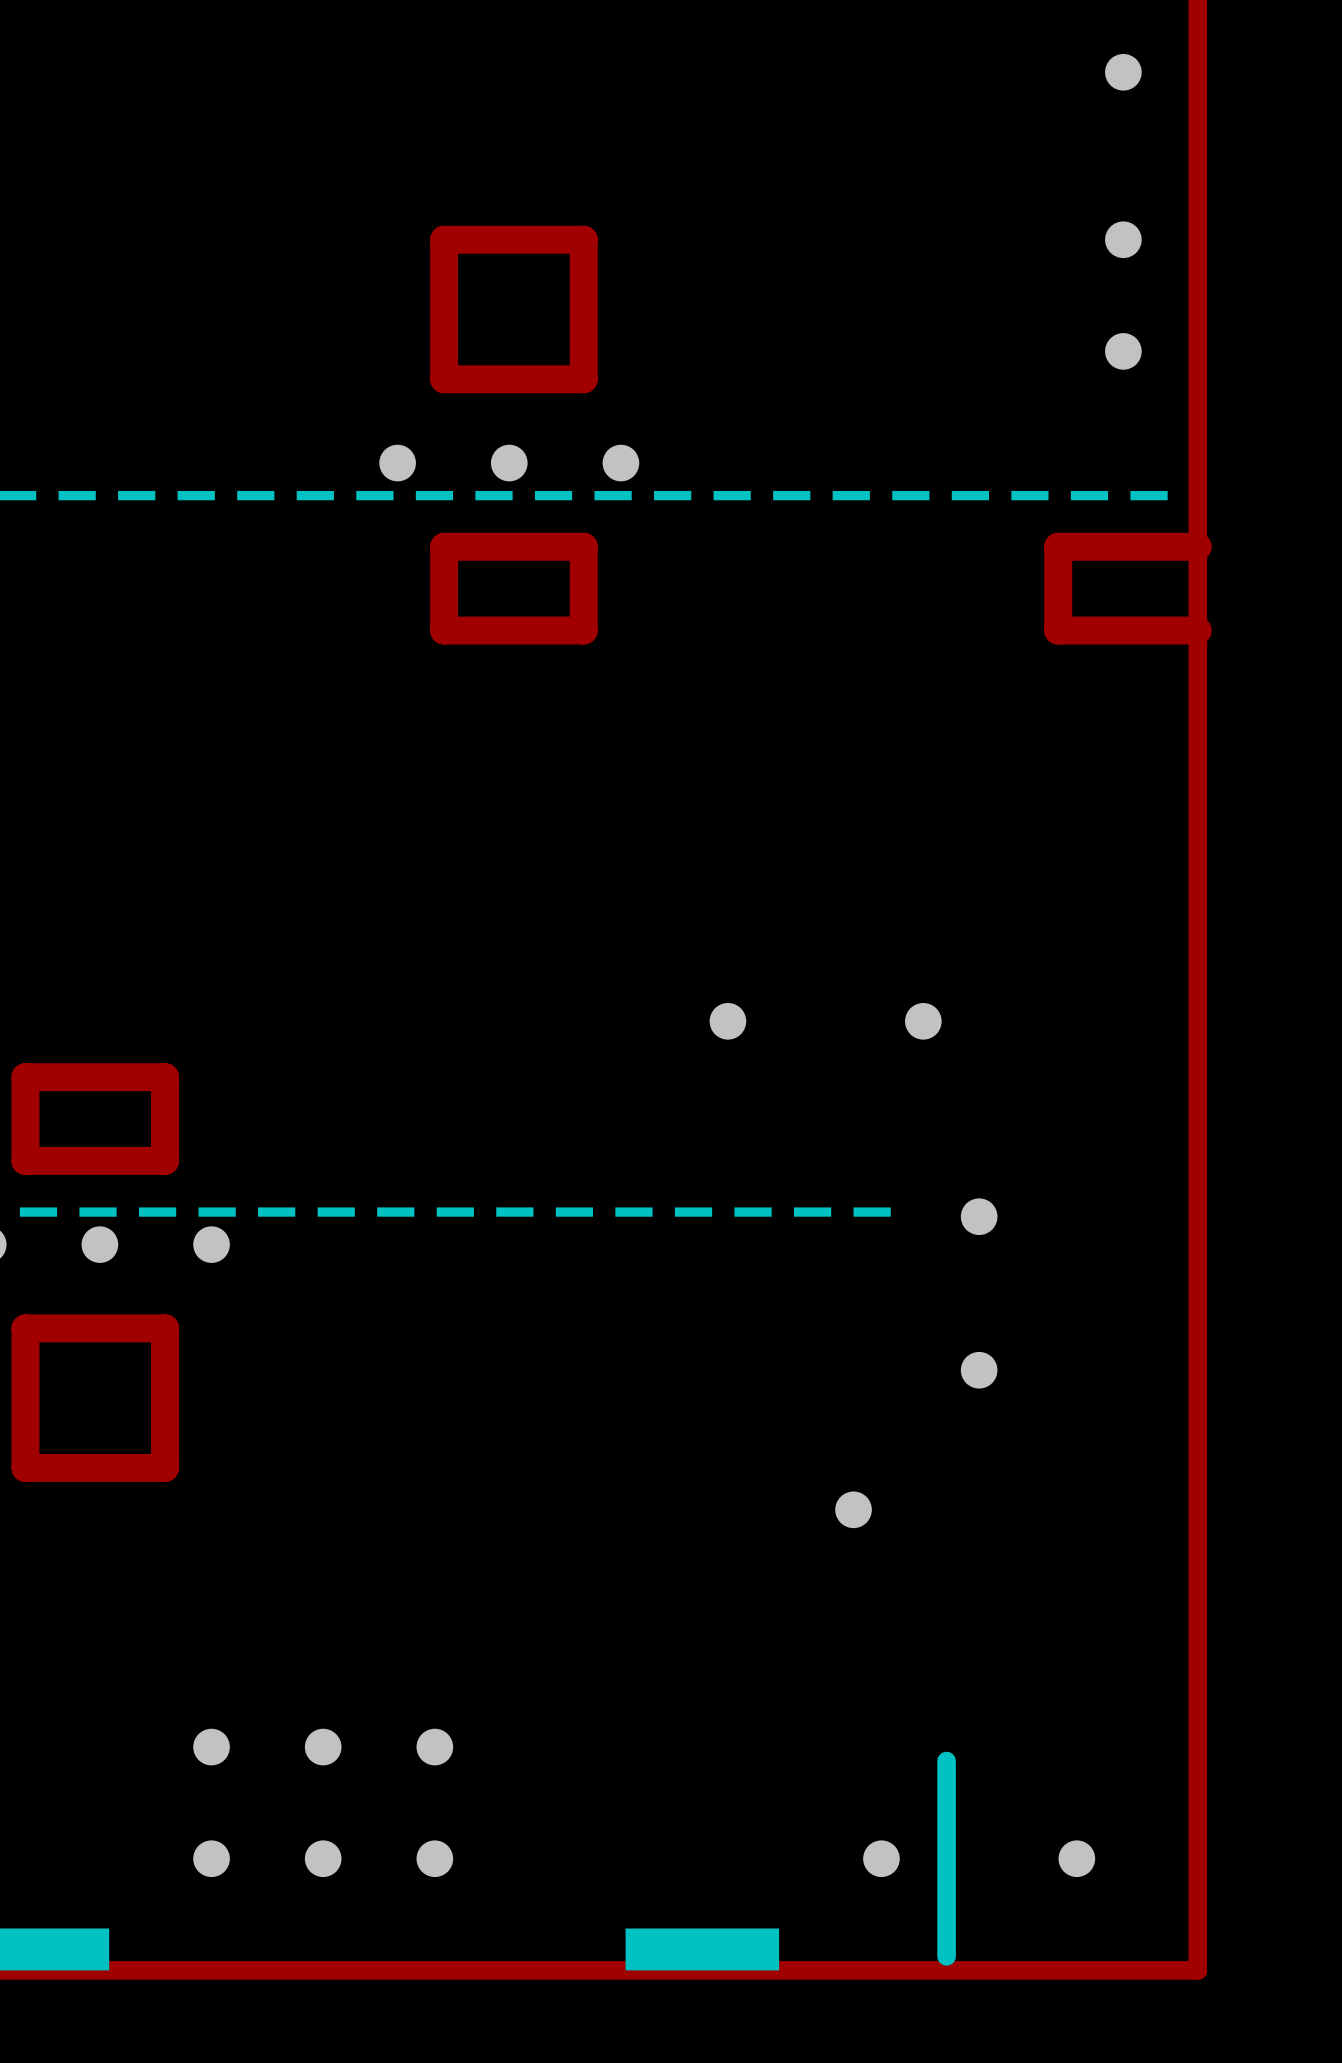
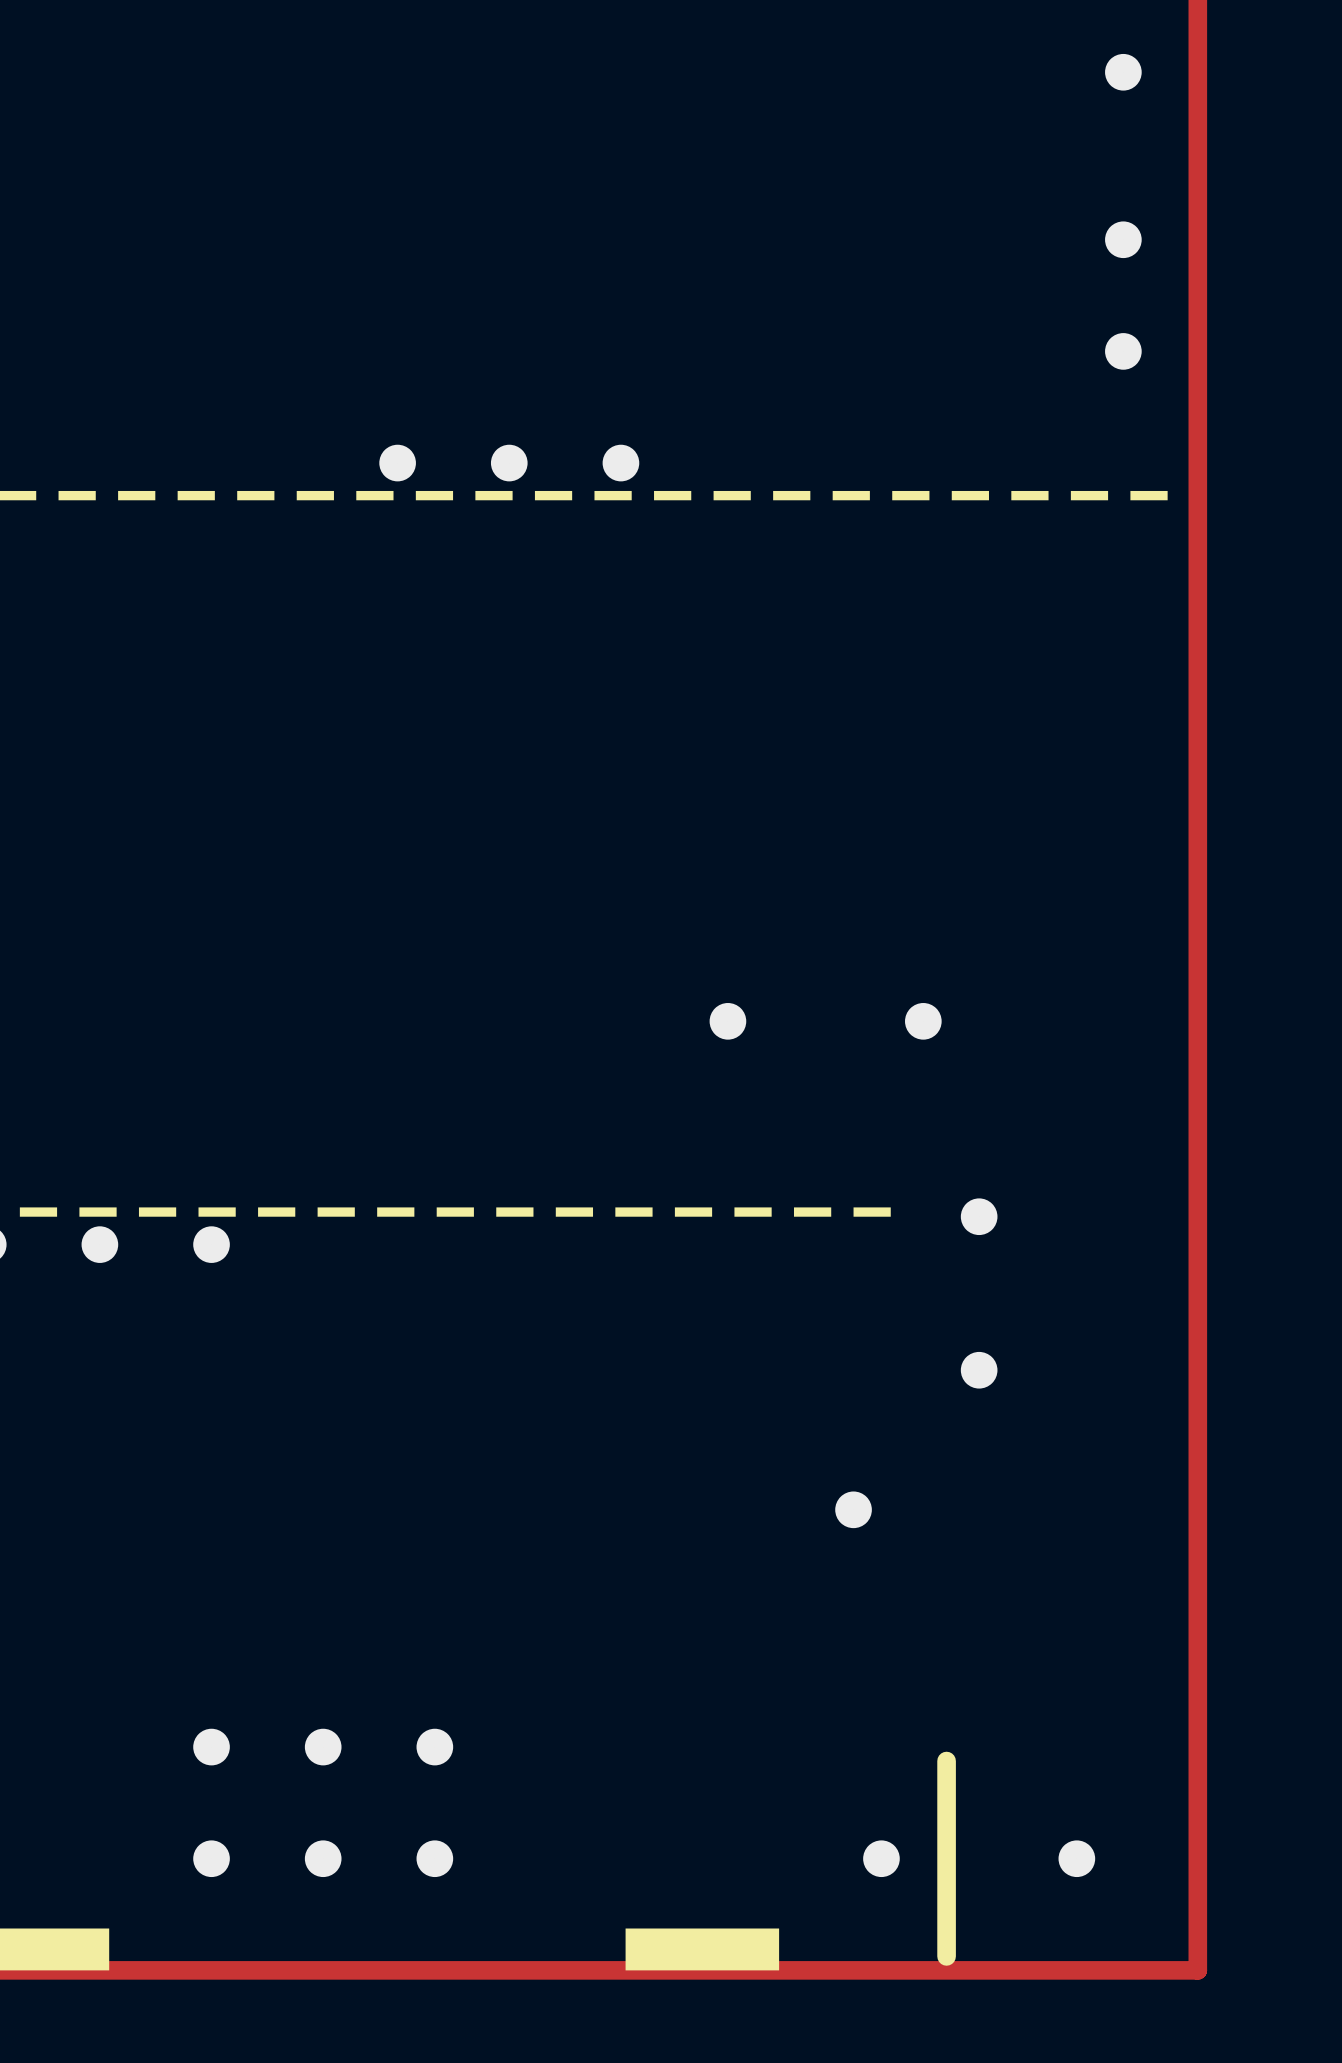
top track: (444, 239) (583, 239) (583, 379) (444, 379) (444, 239) -> none
top track: (444, 546) (583, 546) (583, 630) (444, 630) (444, 546) -> none
top track: (1197, 546) (1058, 546) (1058, 630) (1197, 630) -> none
top track: (25, 1077) (165, 1077) (165, 1160) (25, 1160) (25, 1077) -> none
top track: (25, 1328) (25, 1467) (165, 1467) (165, 1328) (25, 1328) -> none

